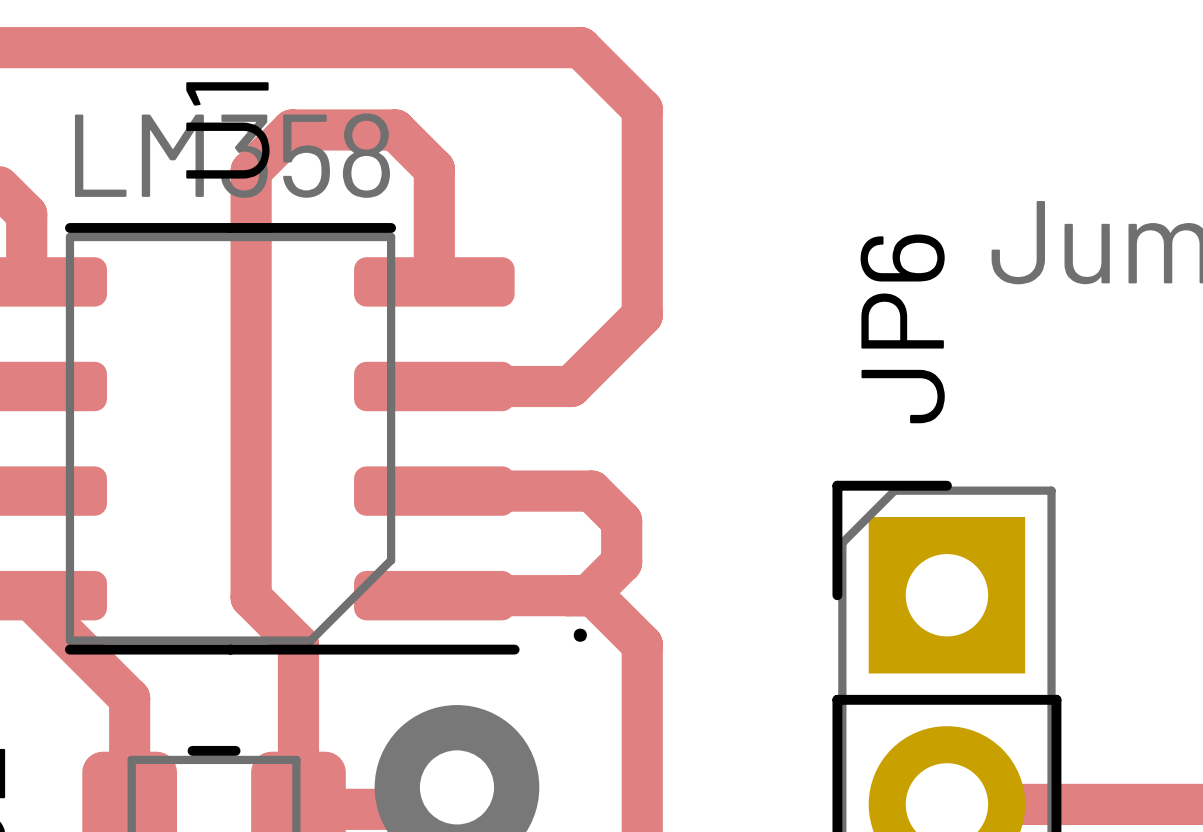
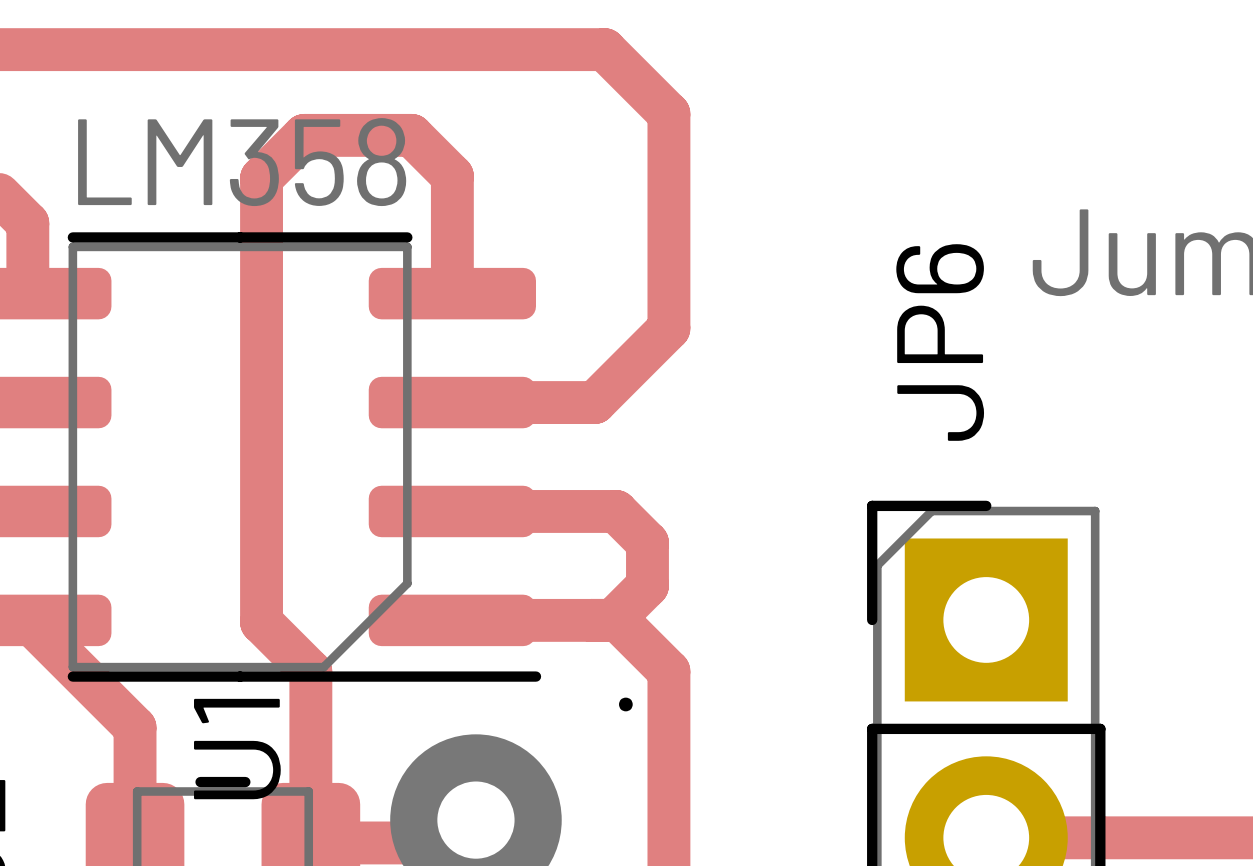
U1 name position: U1 (227, 130) -> U1 (237, 749)
text position: . (580, 635) -> . (625, 704)

